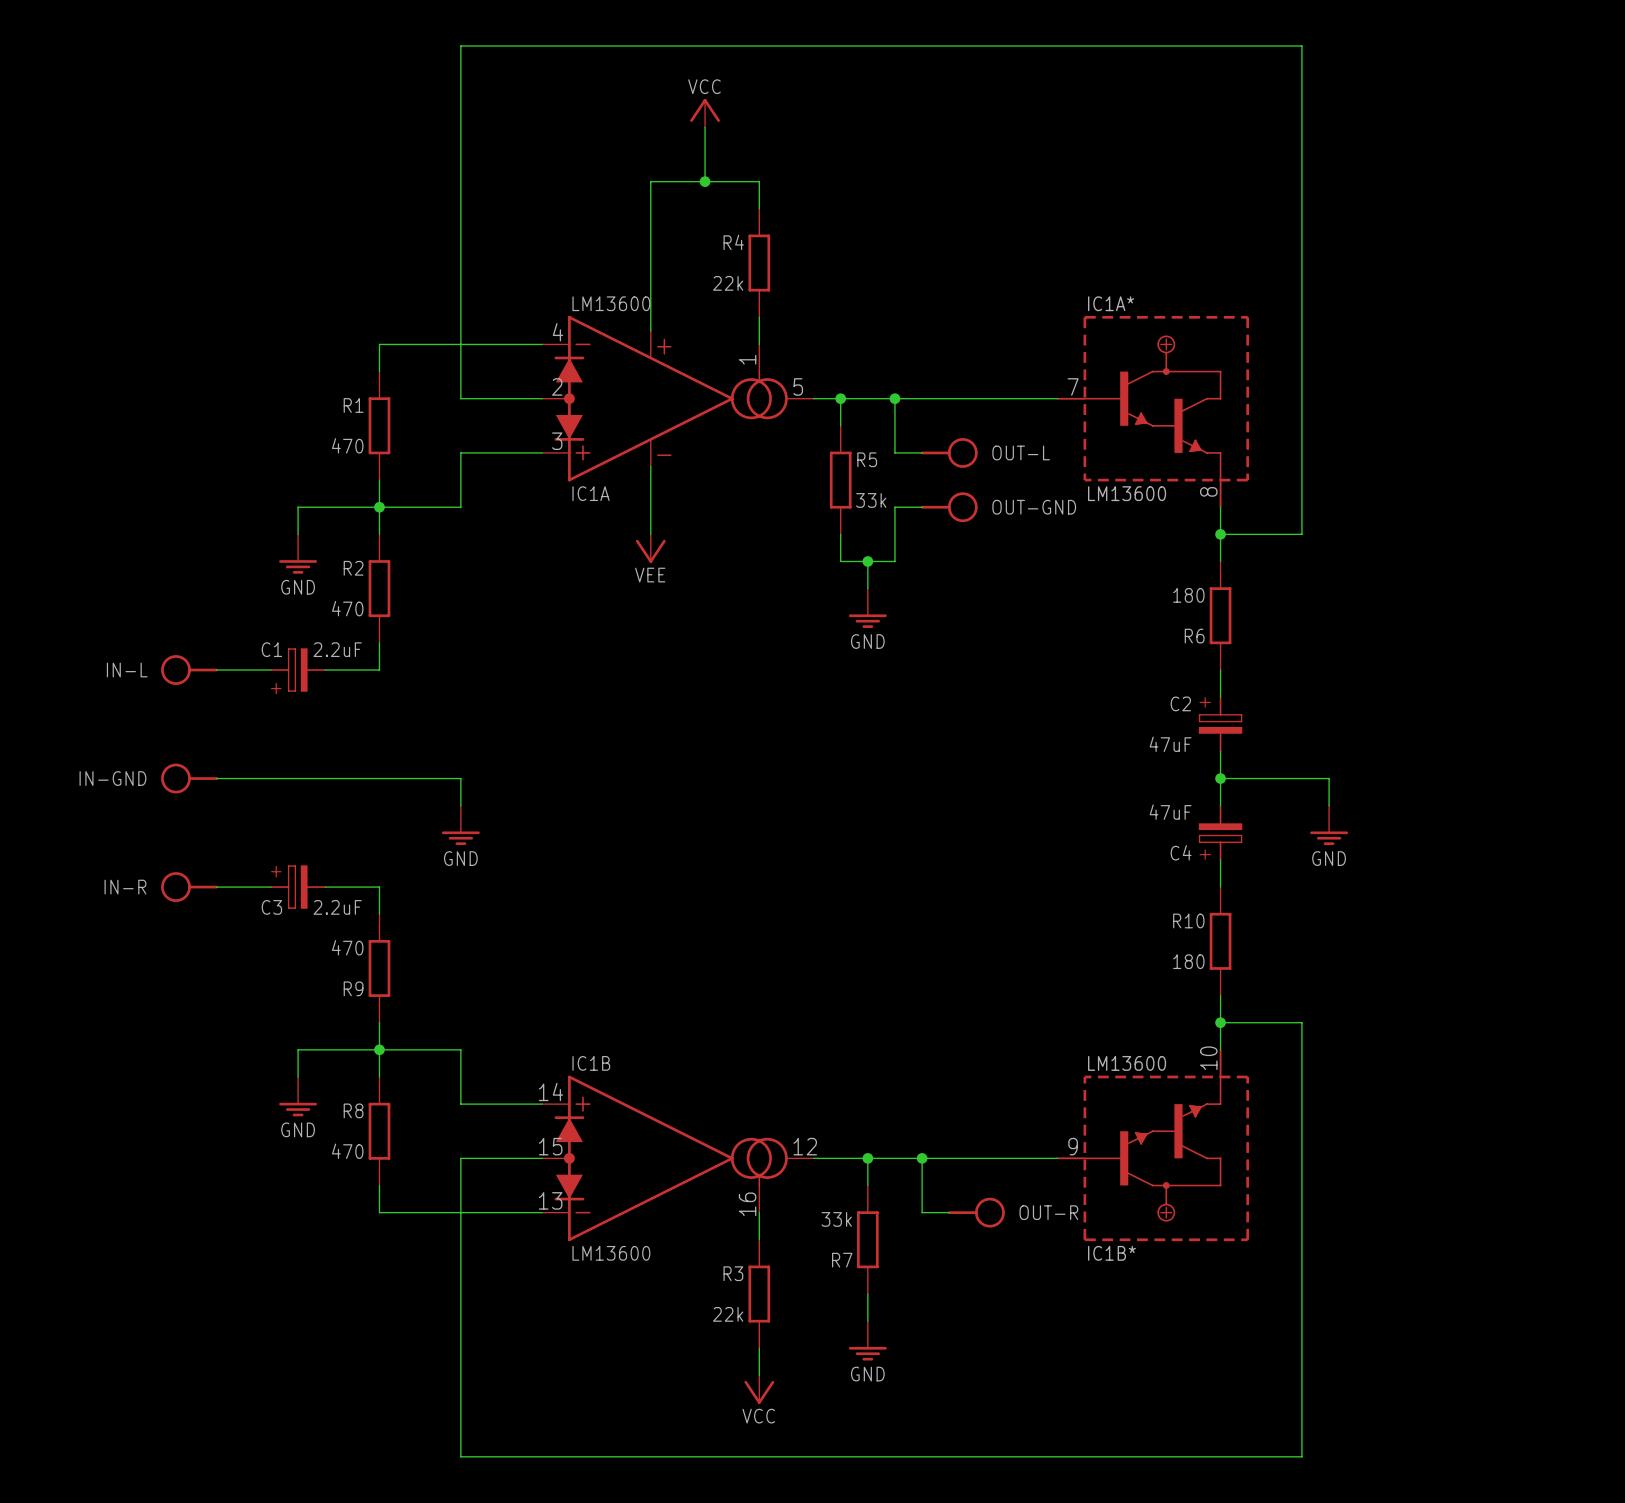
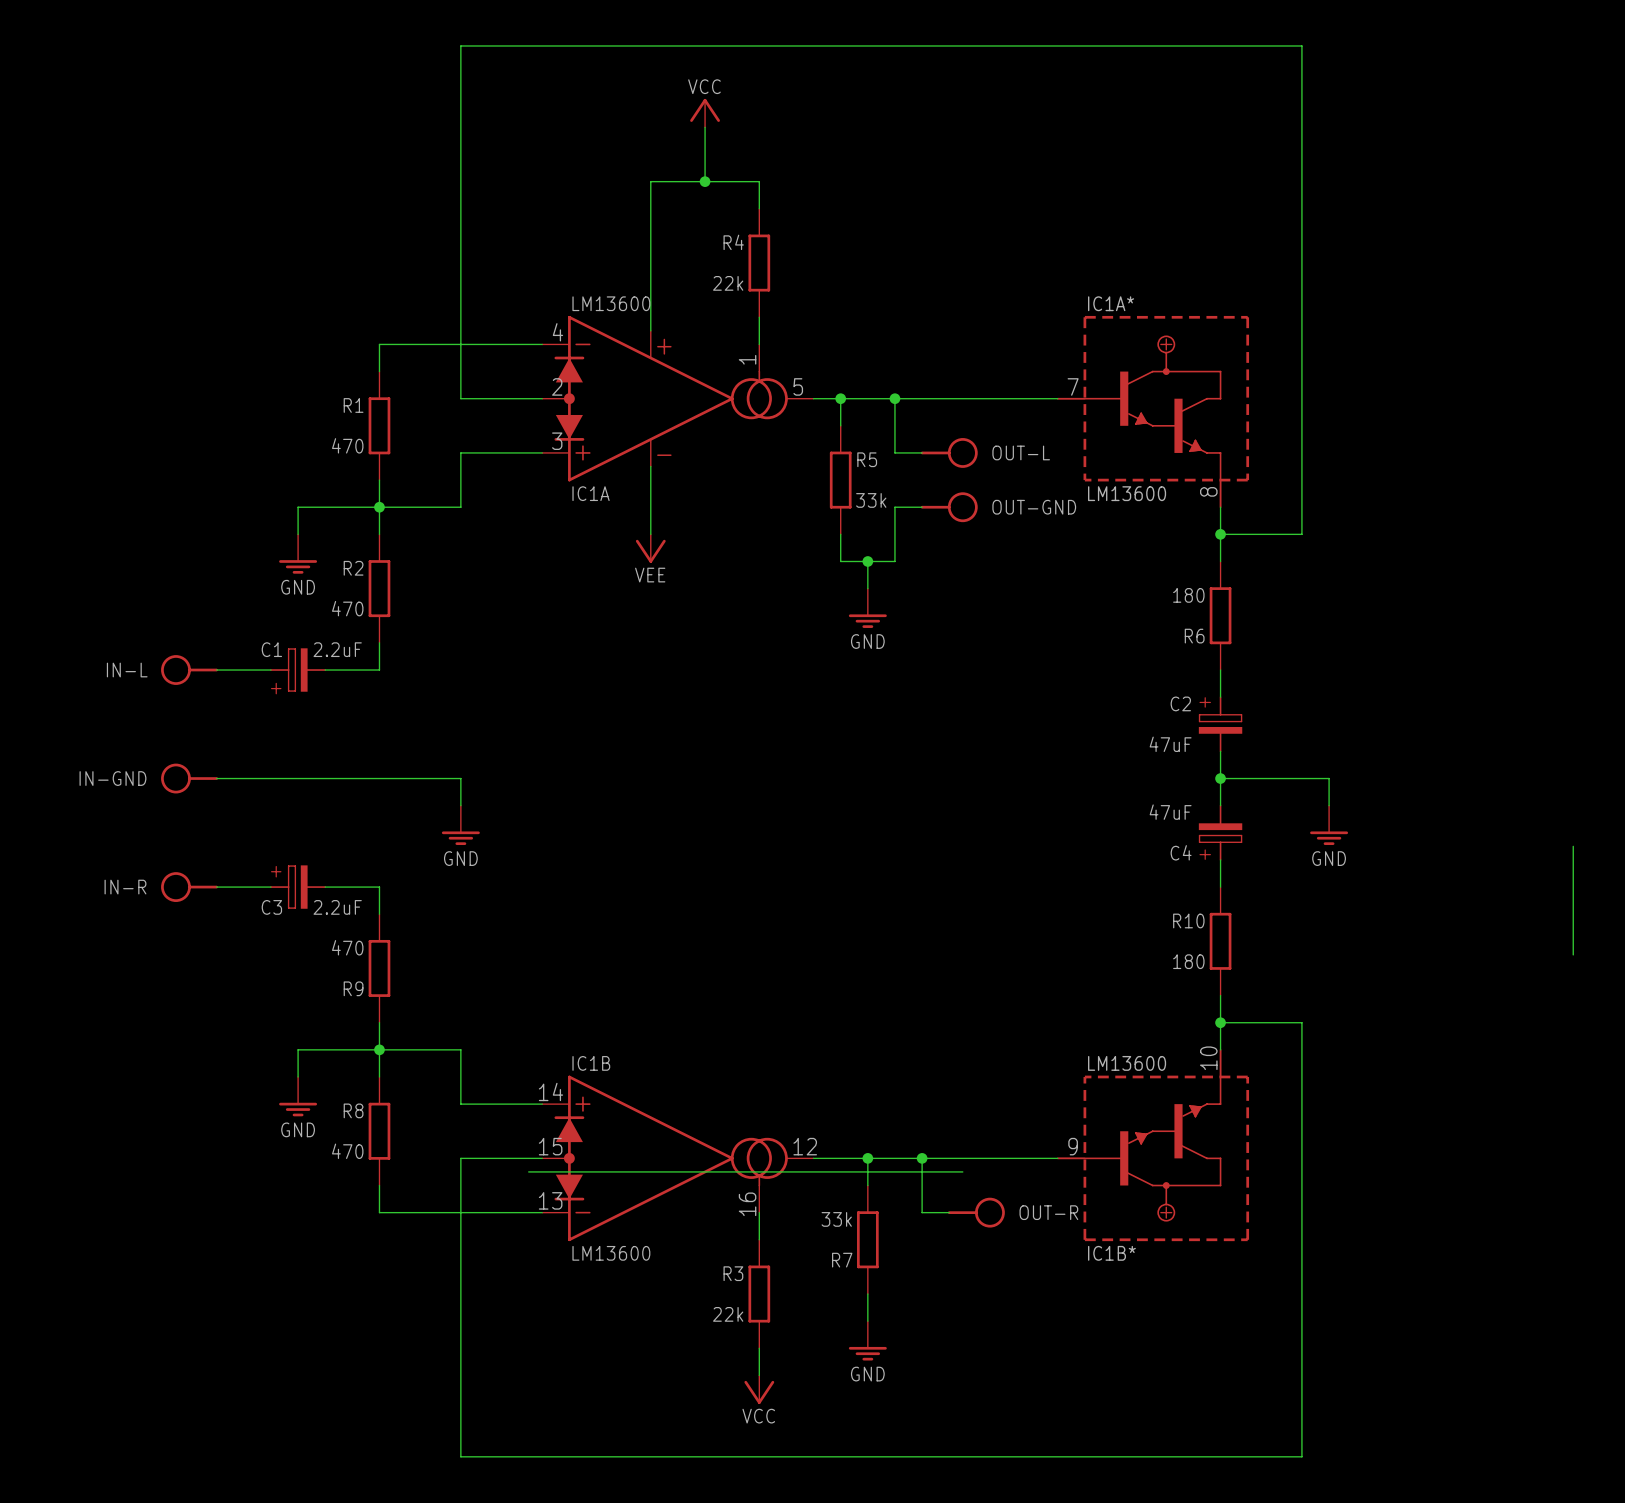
wire: none -> (1573, 846) (1573, 954)
wire: none -> (528, 1171) (962, 1171)

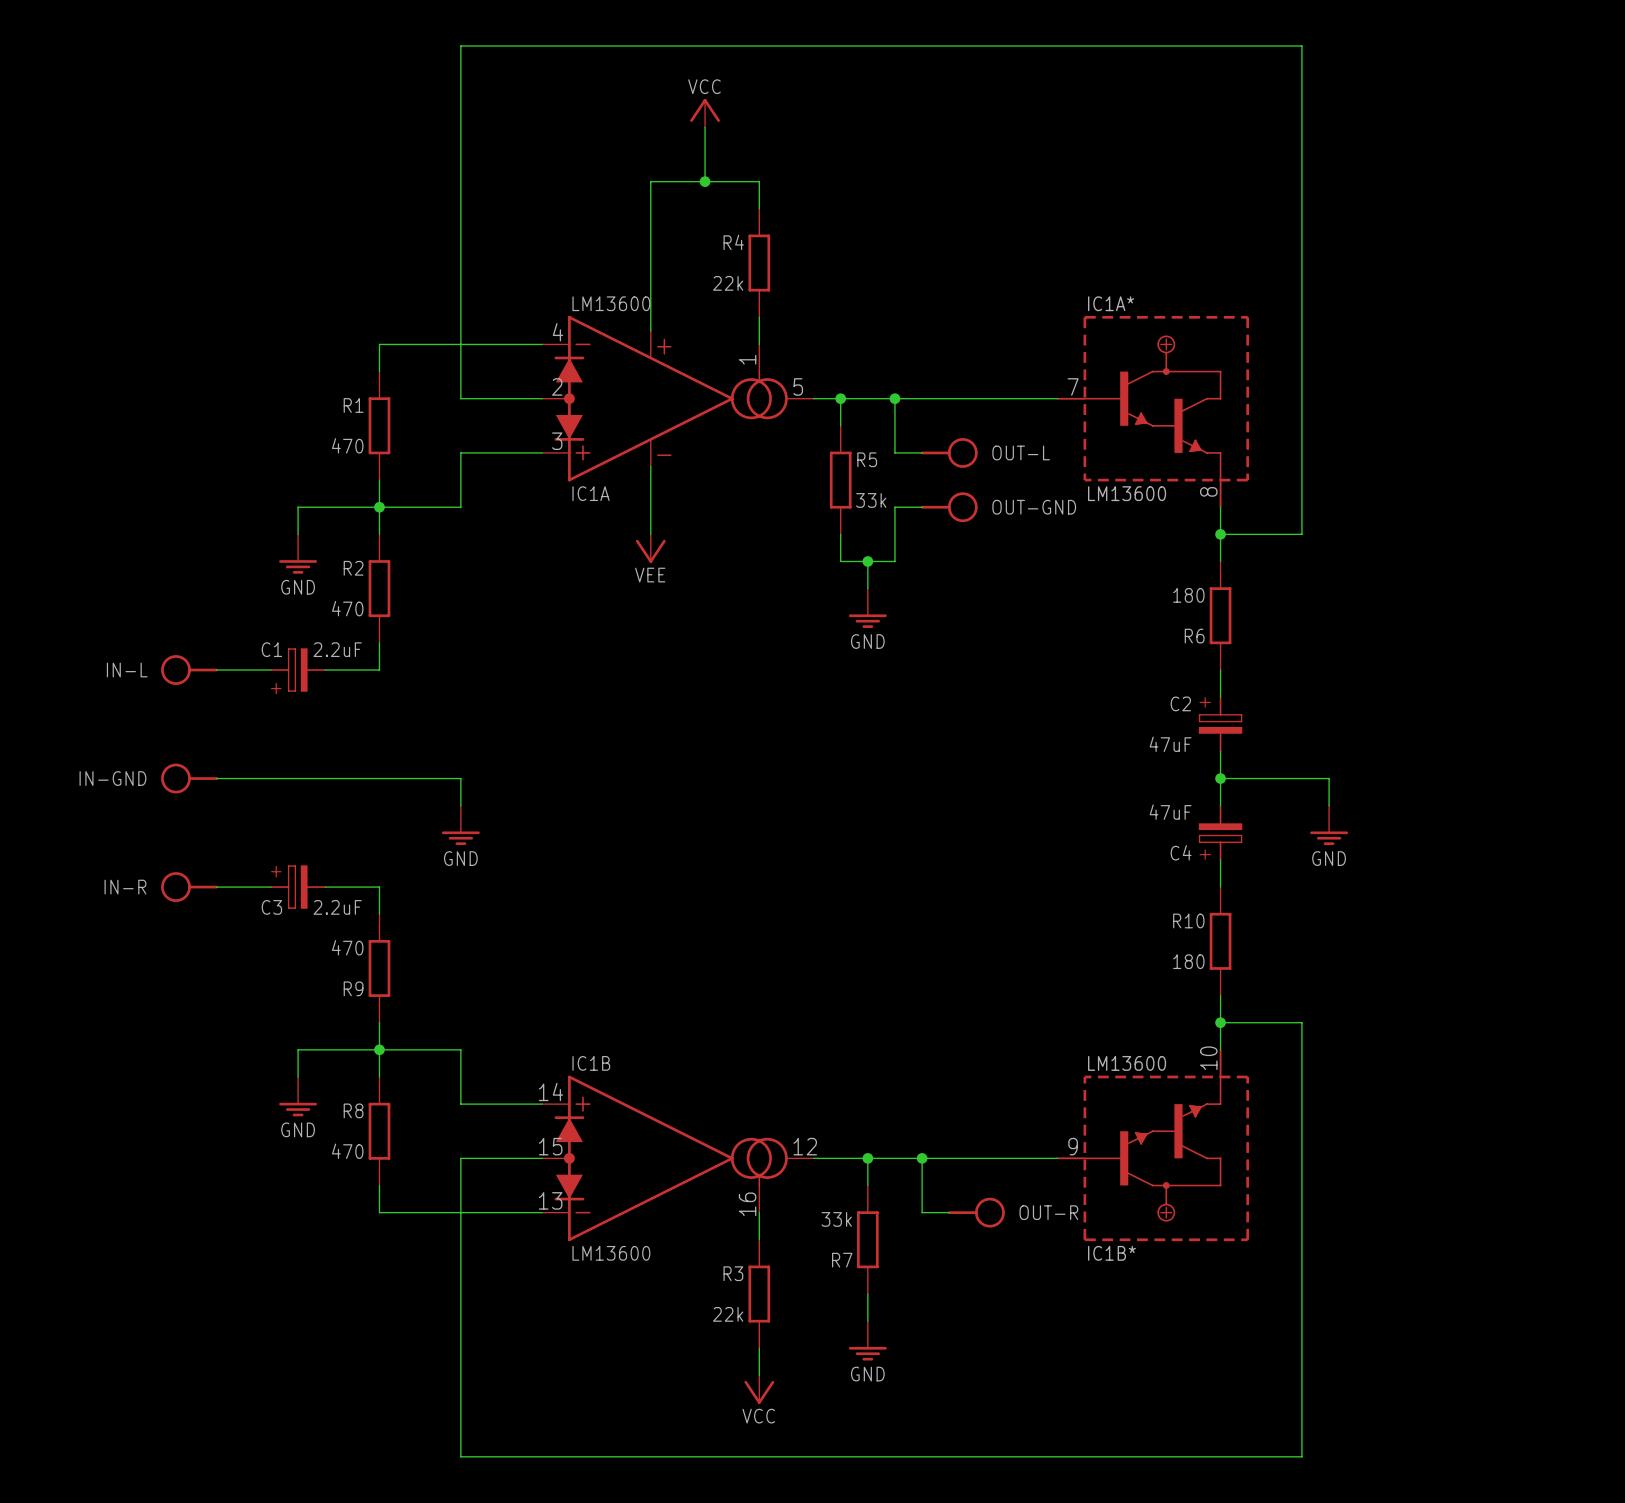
wire: (1573, 846) (1573, 954) -> none
wire: (528, 1171) (962, 1171) -> none

